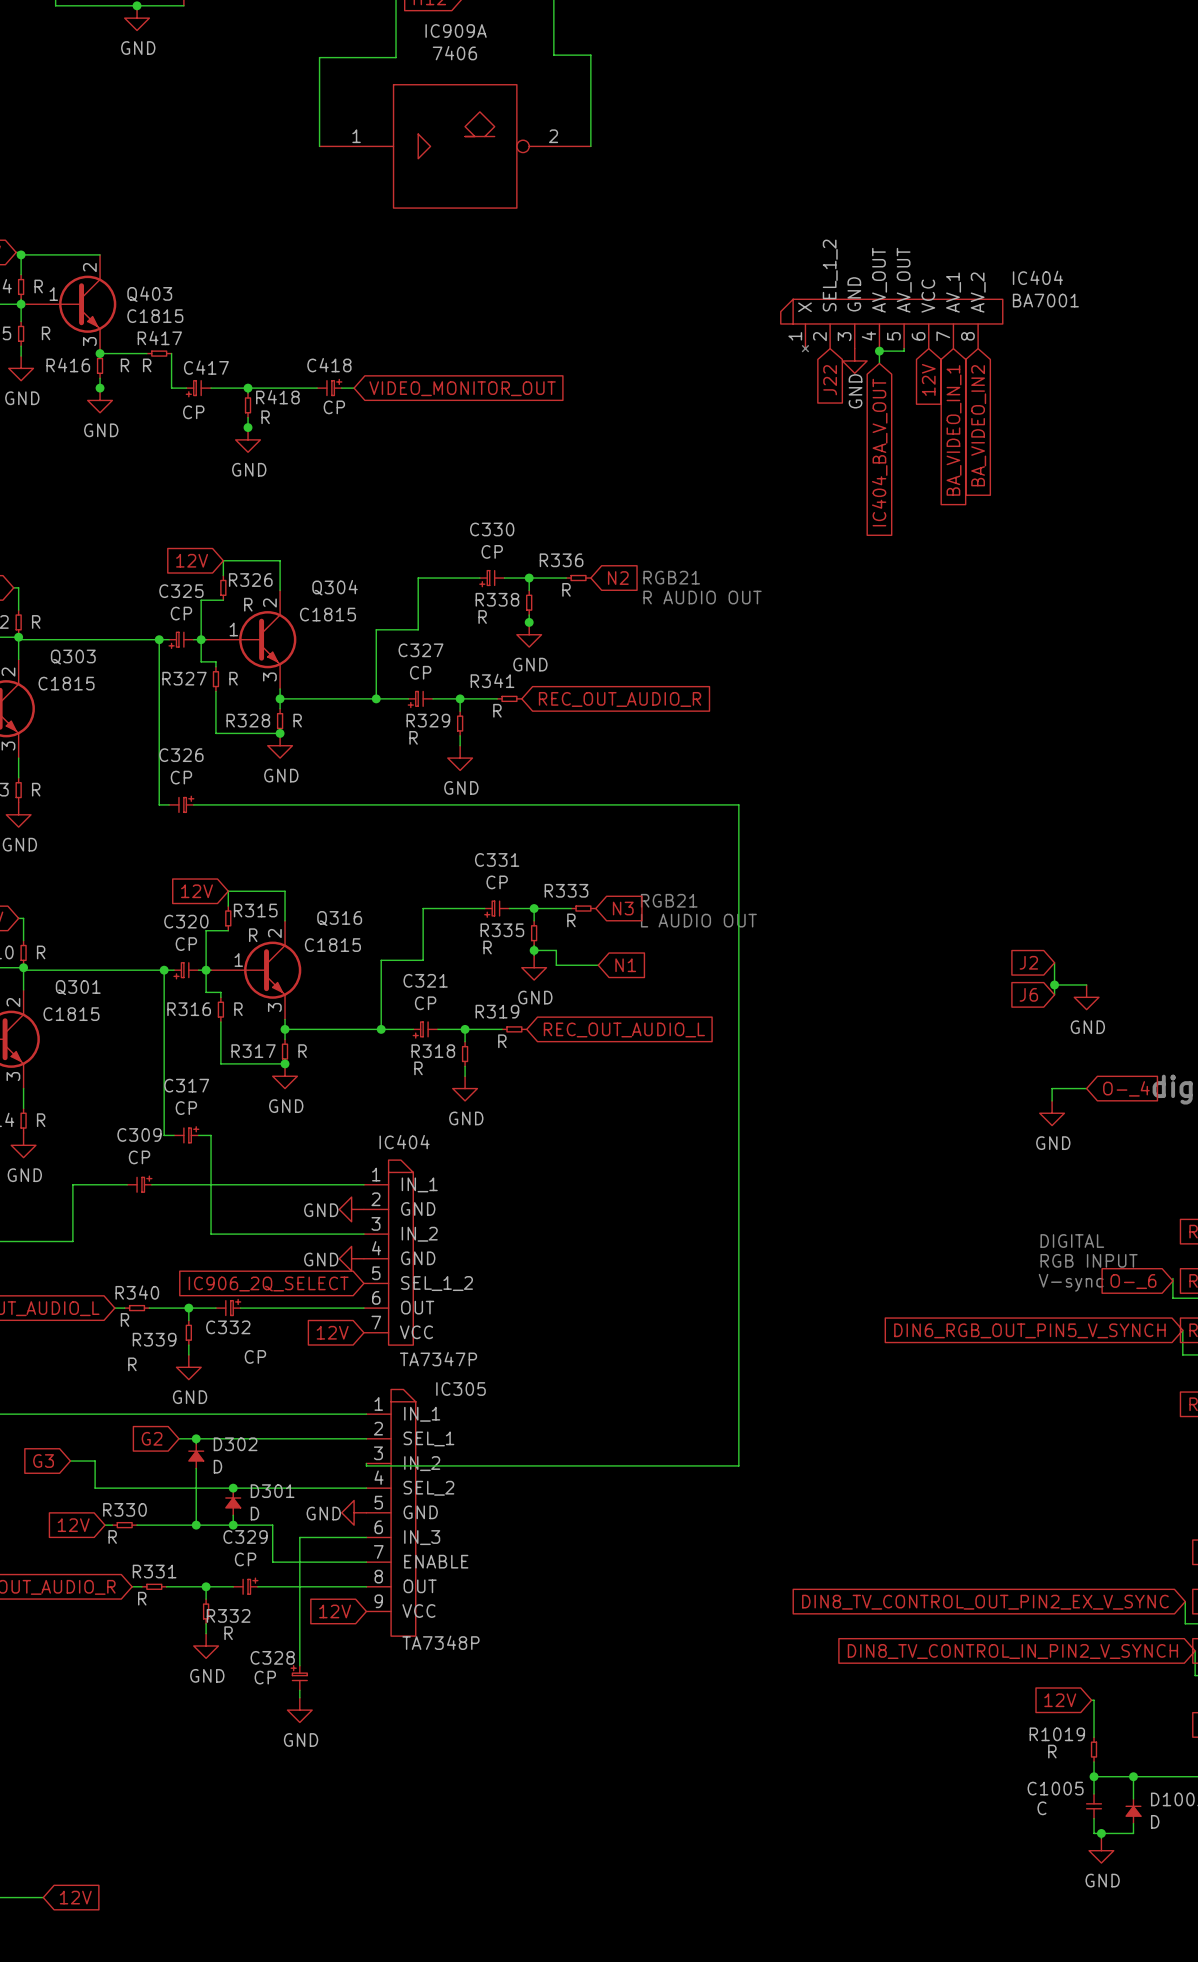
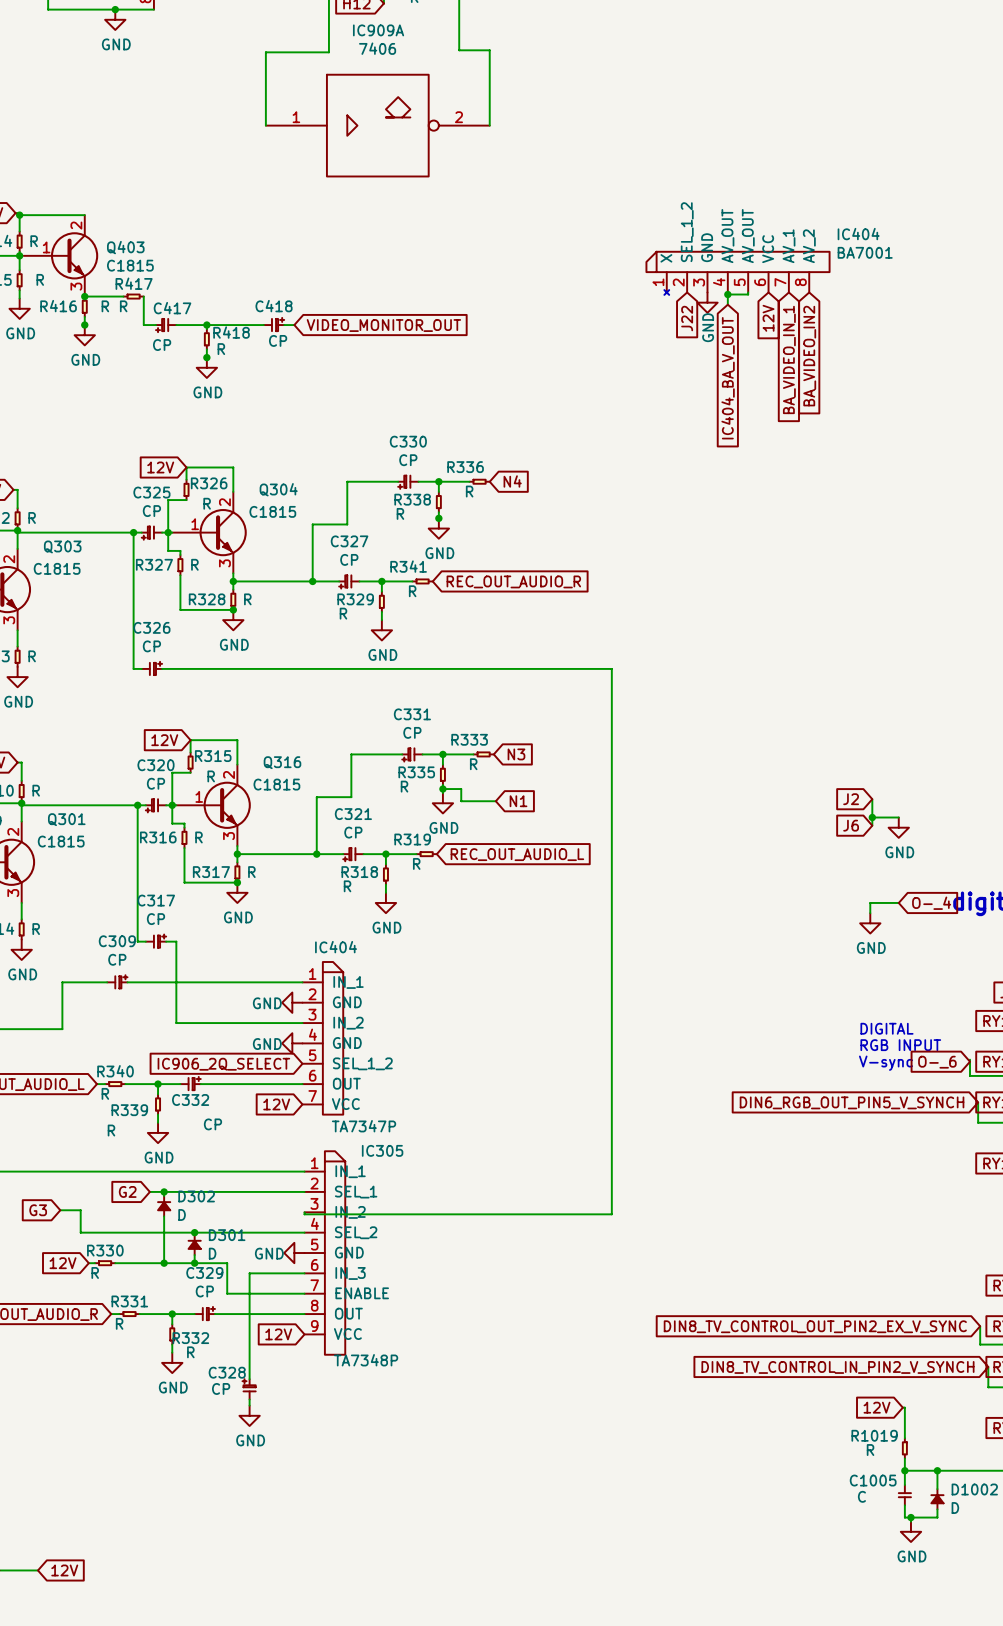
text: RGB21 (671, 577) -> none
global label: N2 (618, 578) -> N4 (512, 481)
text: R AUDIO OUT (702, 597) -> none
text: RGB21 (669, 900) -> none
text: L AUDIO OUT (698, 920) -> none

